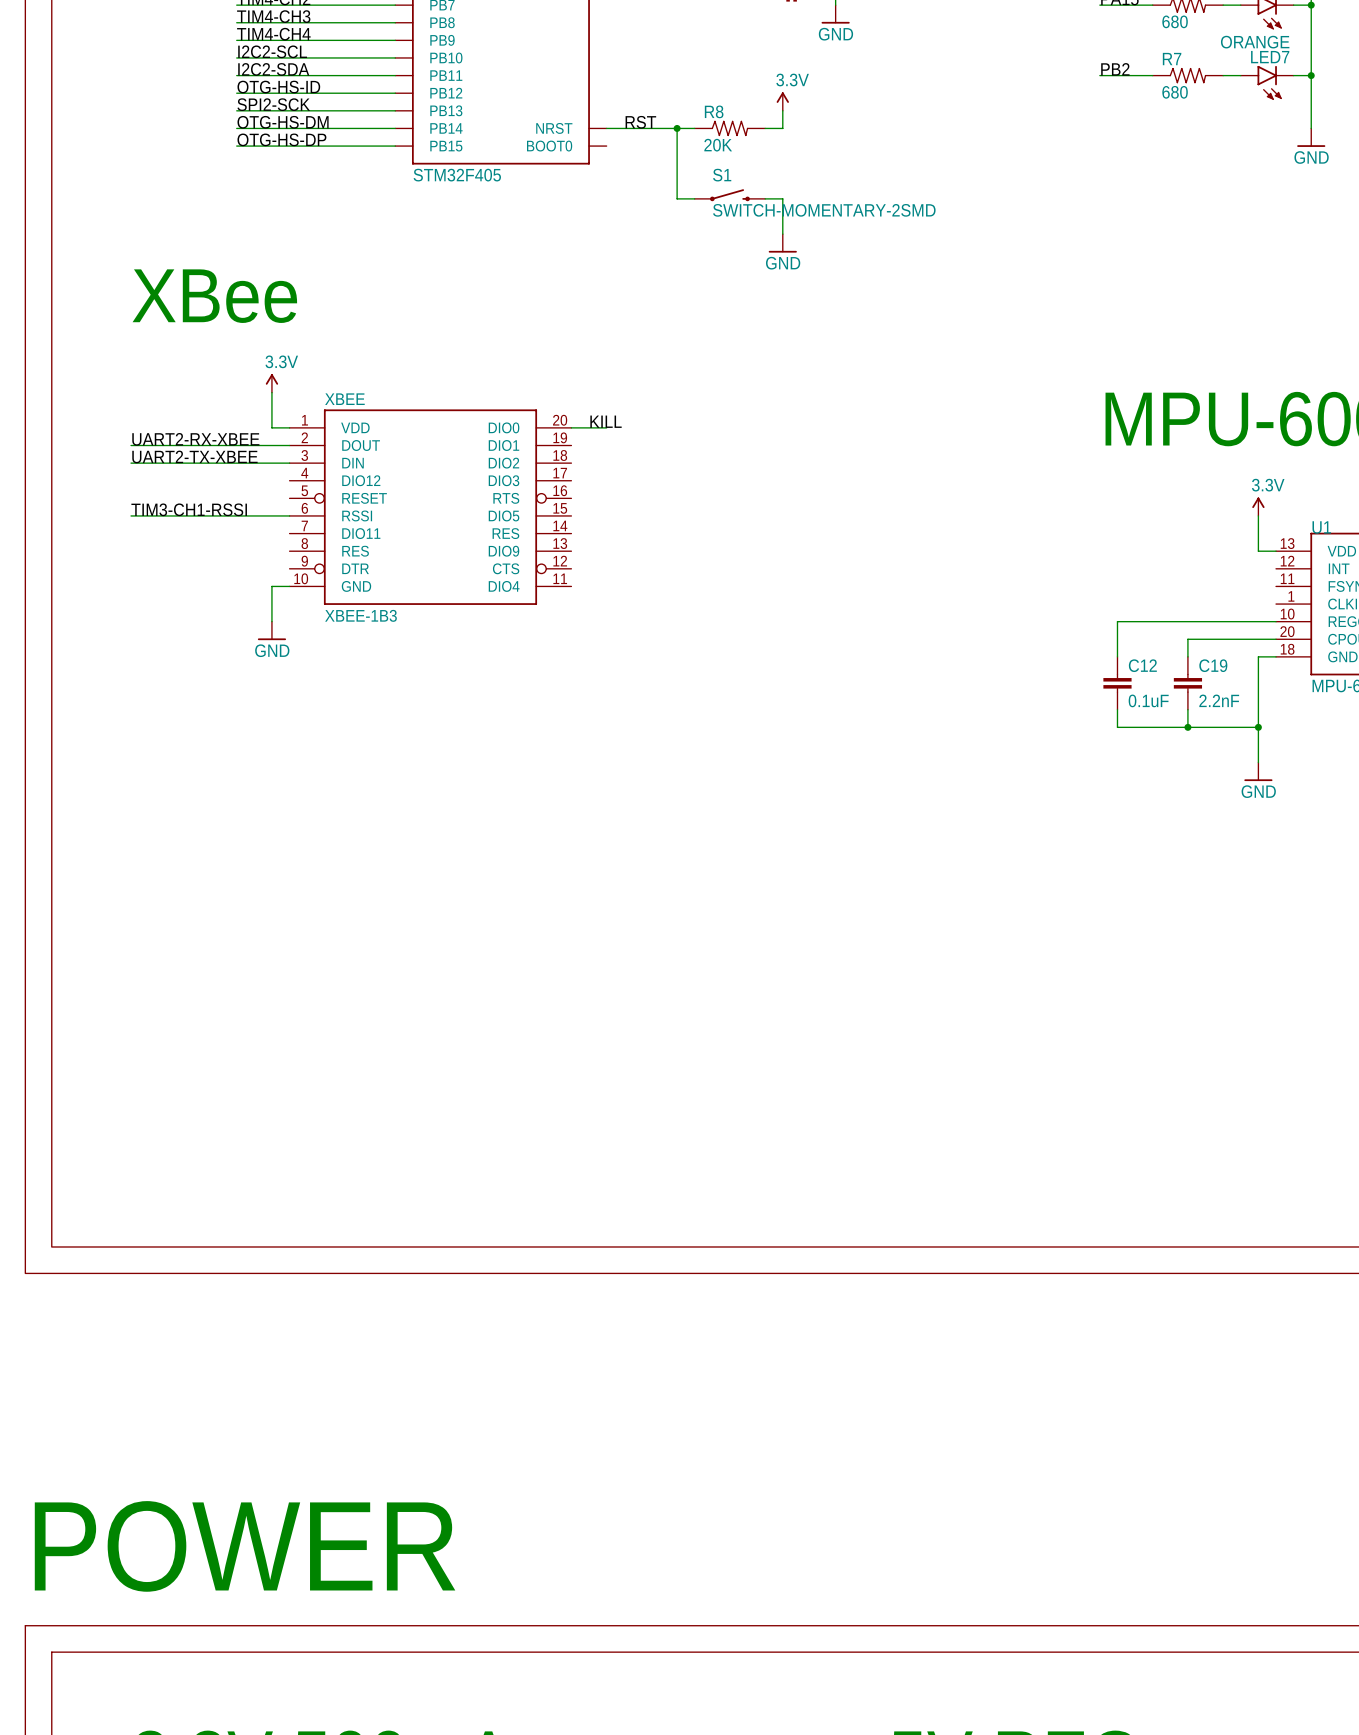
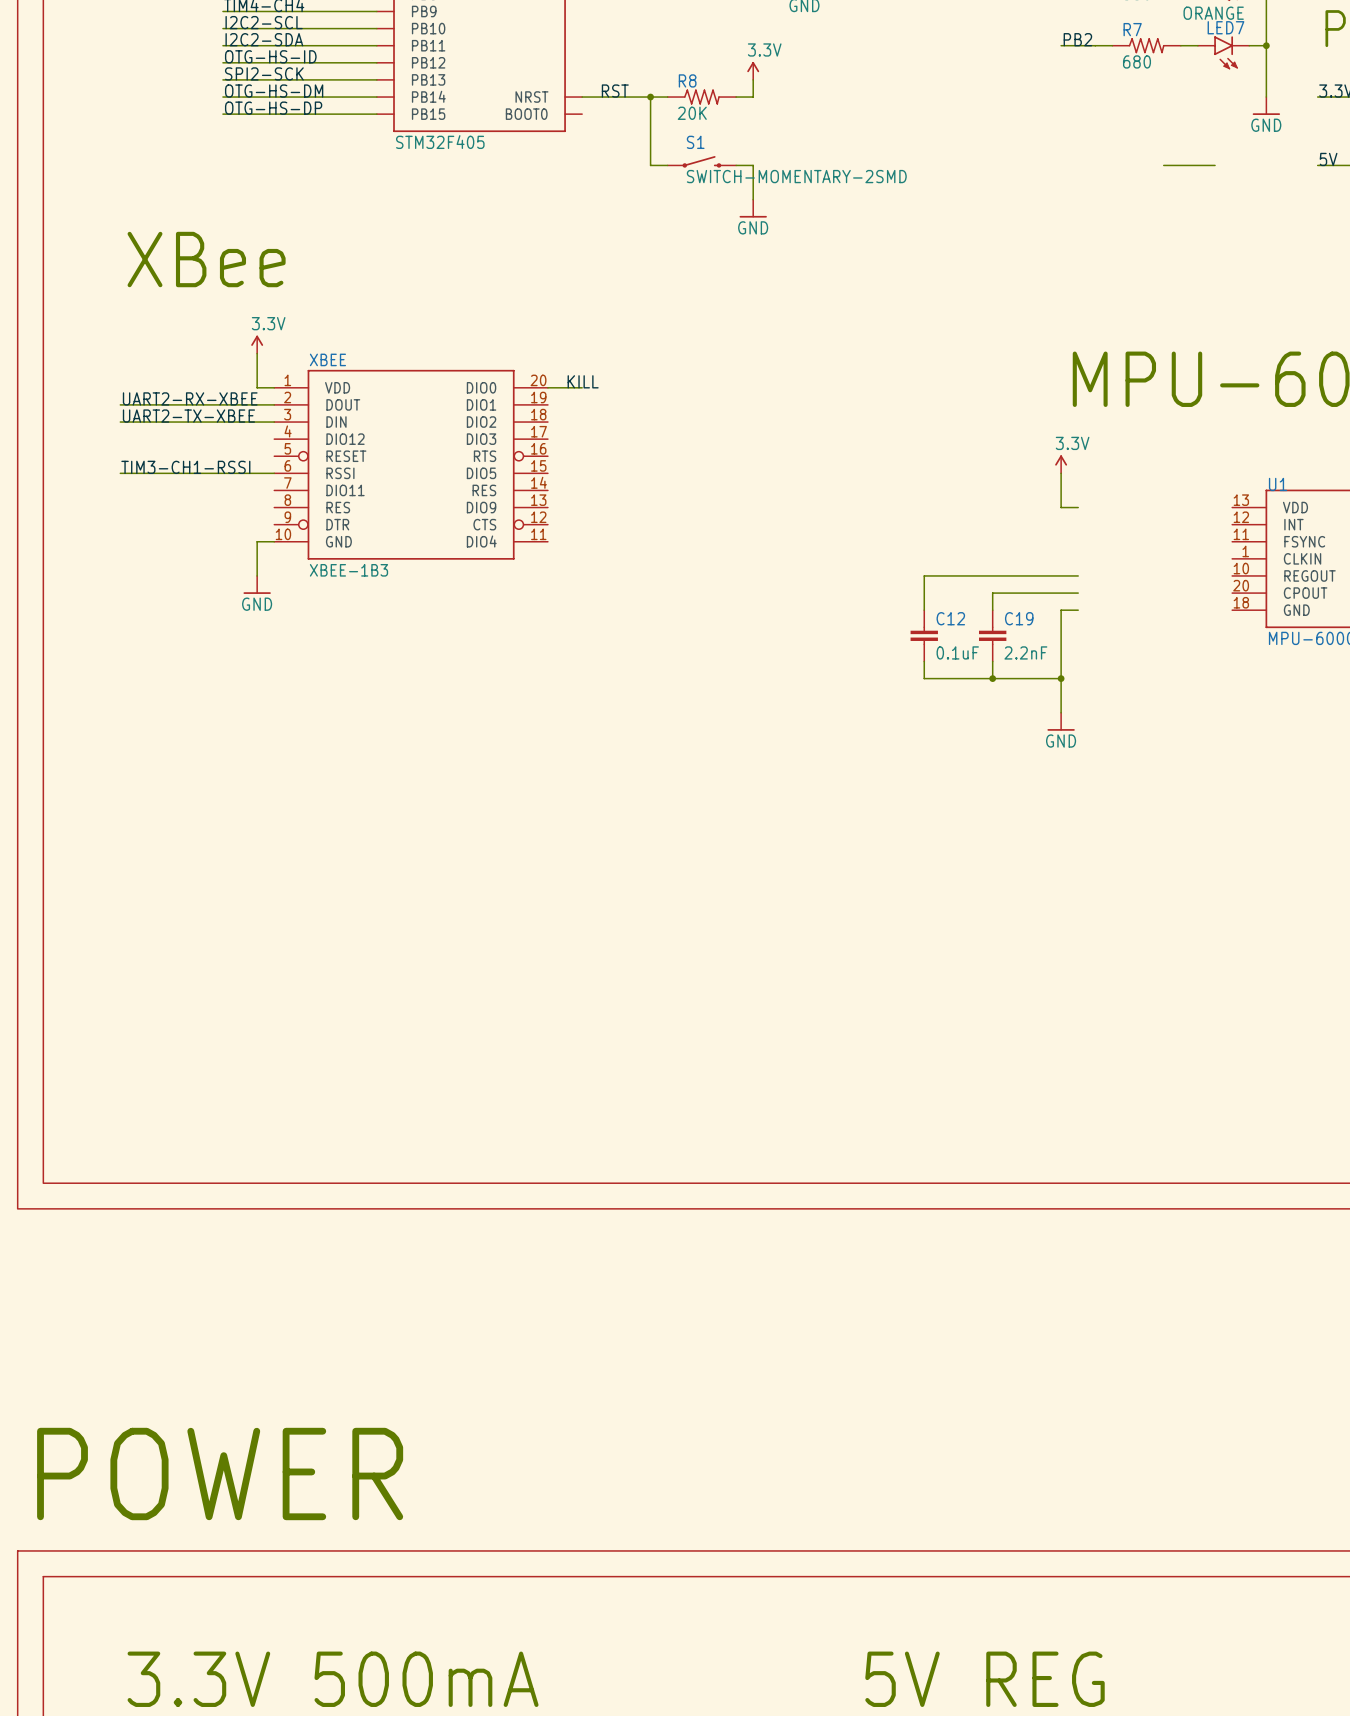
wire: none -> (1163, 165) (1215, 165)
power symbol: none -> 3.3V (1061, 464)
power symbol: 3.3V (1258, 506) -> none
wire: (1258, 515) (1258, 551) (1276, 551) -> (1061, 473) (1061, 507) (1078, 507)
wire: none -> (1078, 575) (924, 575) (924, 610)
wire: (1276, 621) (1117, 621) (1117, 656) -> (1061, 712) (1061, 610) (1078, 610)
wire: (1276, 639) (1187, 639) (1187, 656) -> (1078, 593) (992, 593) (992, 610)
wire: (1276, 656) (1258, 656) (1258, 762) -> none
C12 position: (1117, 683) -> (924, 635)
C19 position: (1187, 683) -> (992, 635)
wire: (1117, 709) (1117, 727) (1258, 727) -> (924, 661) (924, 678) (1061, 678)
wire: (1187, 709) (1187, 727) -> (992, 661) (992, 678)
junction: none -> (992, 678)
junction: none -> (1061, 678)
junction: (1187, 727) -> none
junction: (1258, 727) -> none
power symbol position: GND (1258, 771) -> GND (1061, 721)

